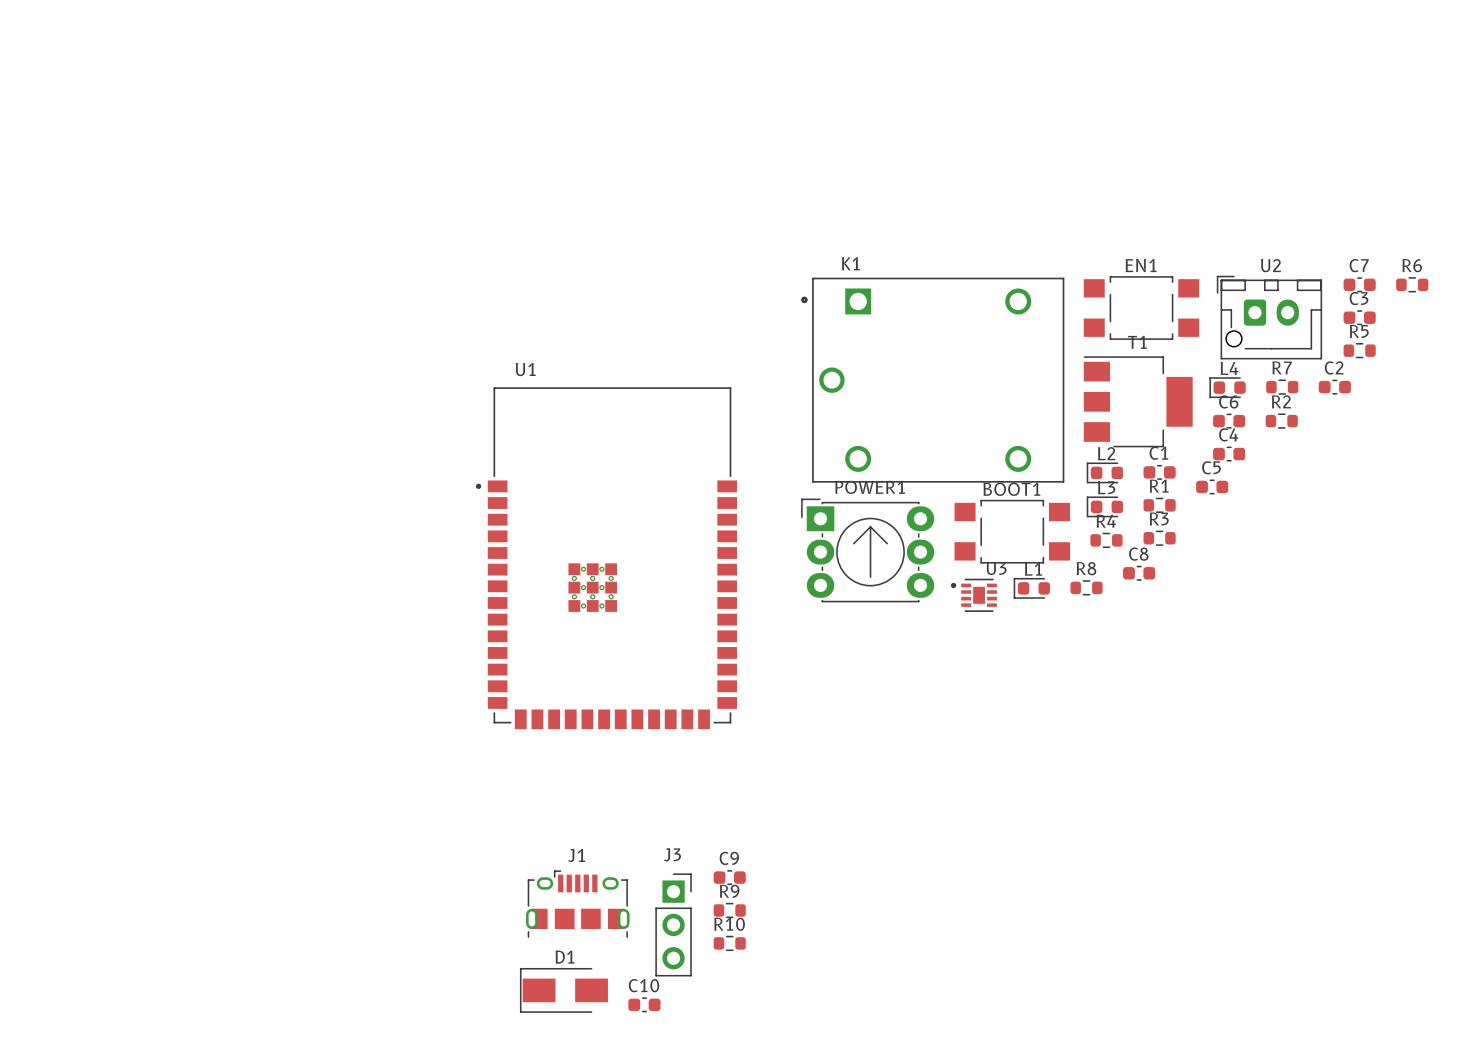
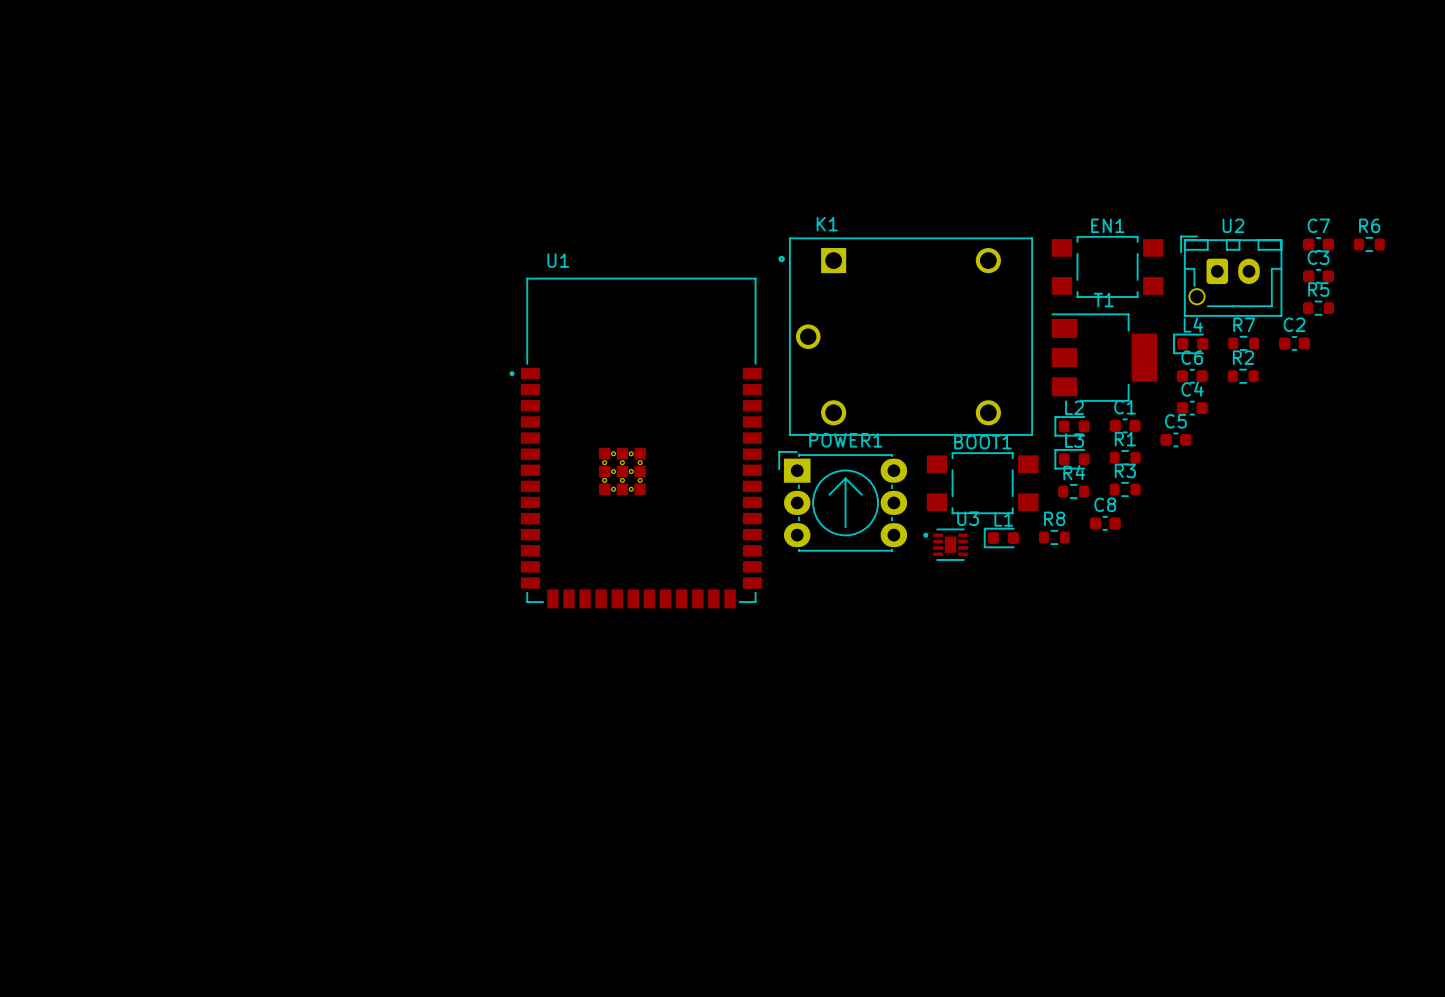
U1 position: (606, 558) -> (635, 443)
C9: (729, 877) -> none
J1: (577, 904) -> none
R9: (729, 910) -> none
J3: (673, 924) -> none
R10: (729, 943) -> none
D1: (563, 990) -> none
C10: (644, 1004) -> none

